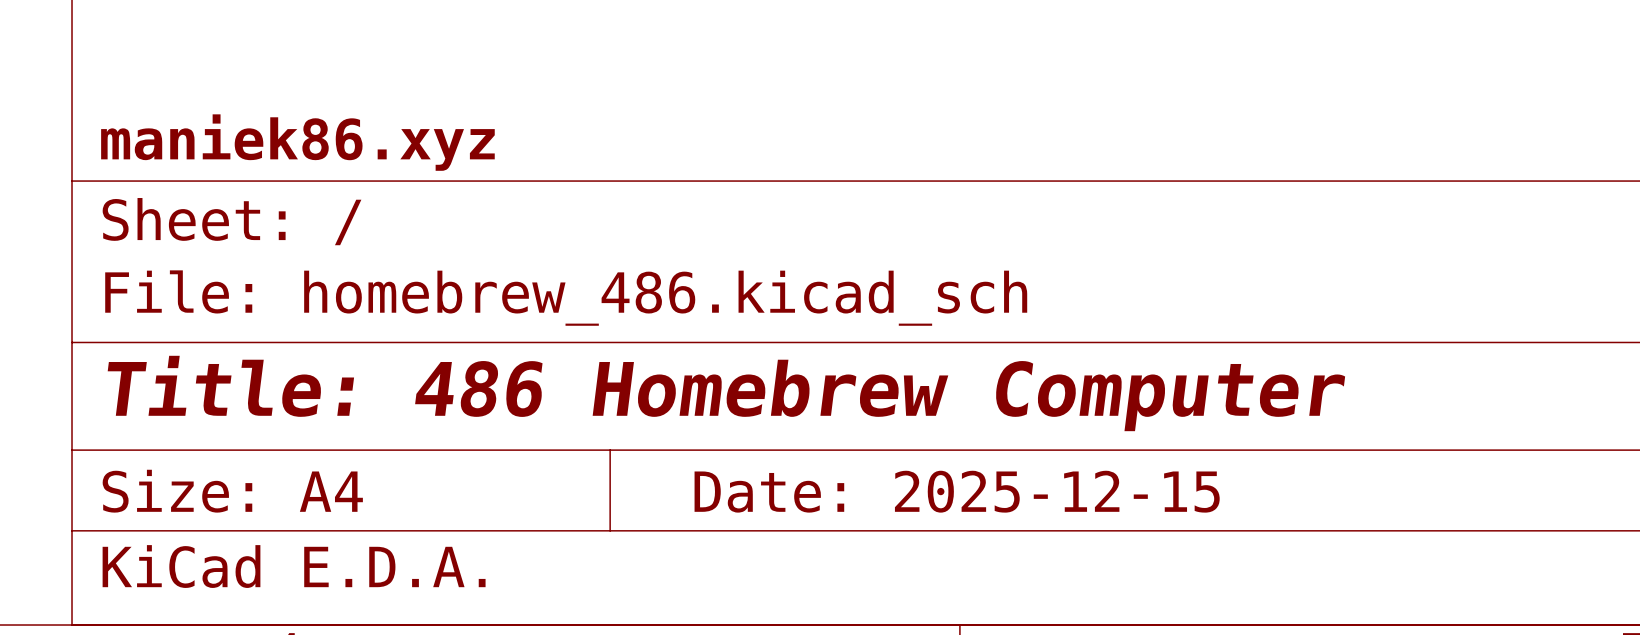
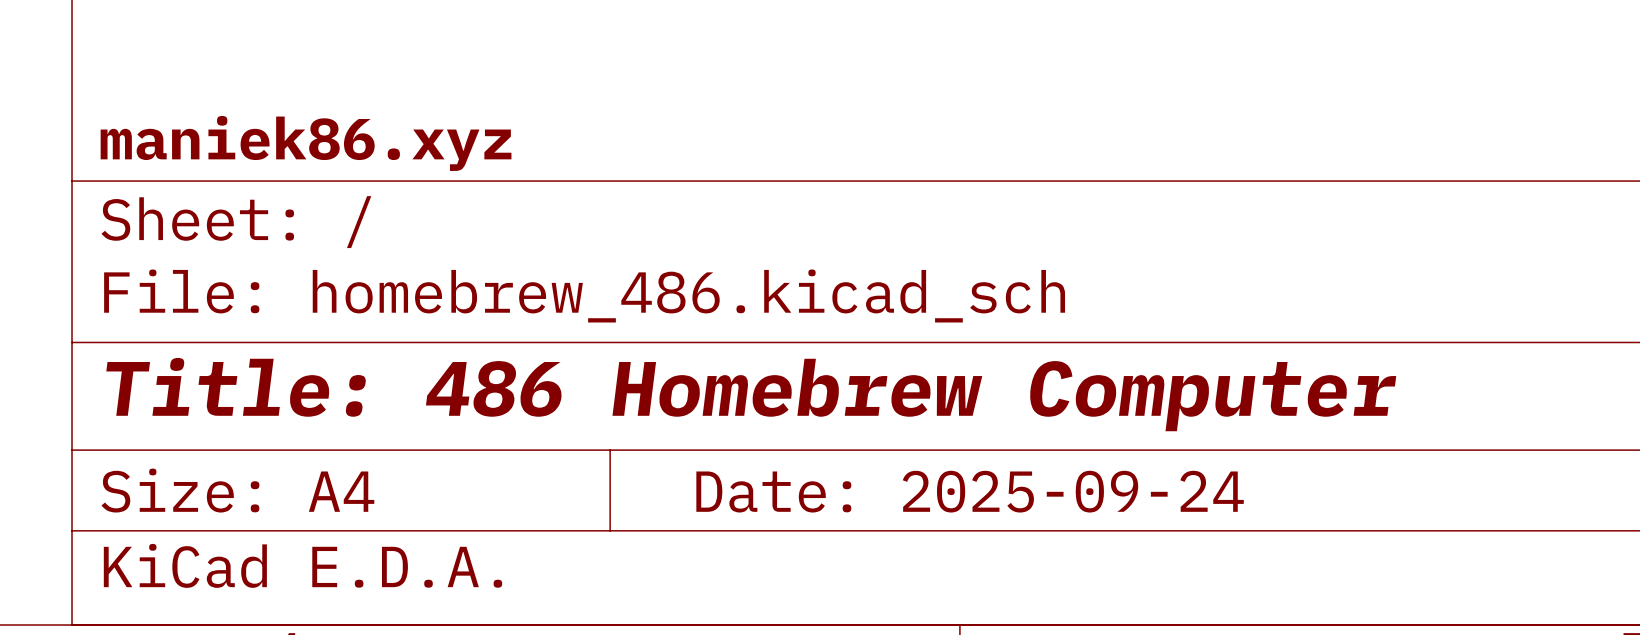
title block: Date: 2025-12-15 (957, 491) -> Date: 2025-09-24 (970, 491)

